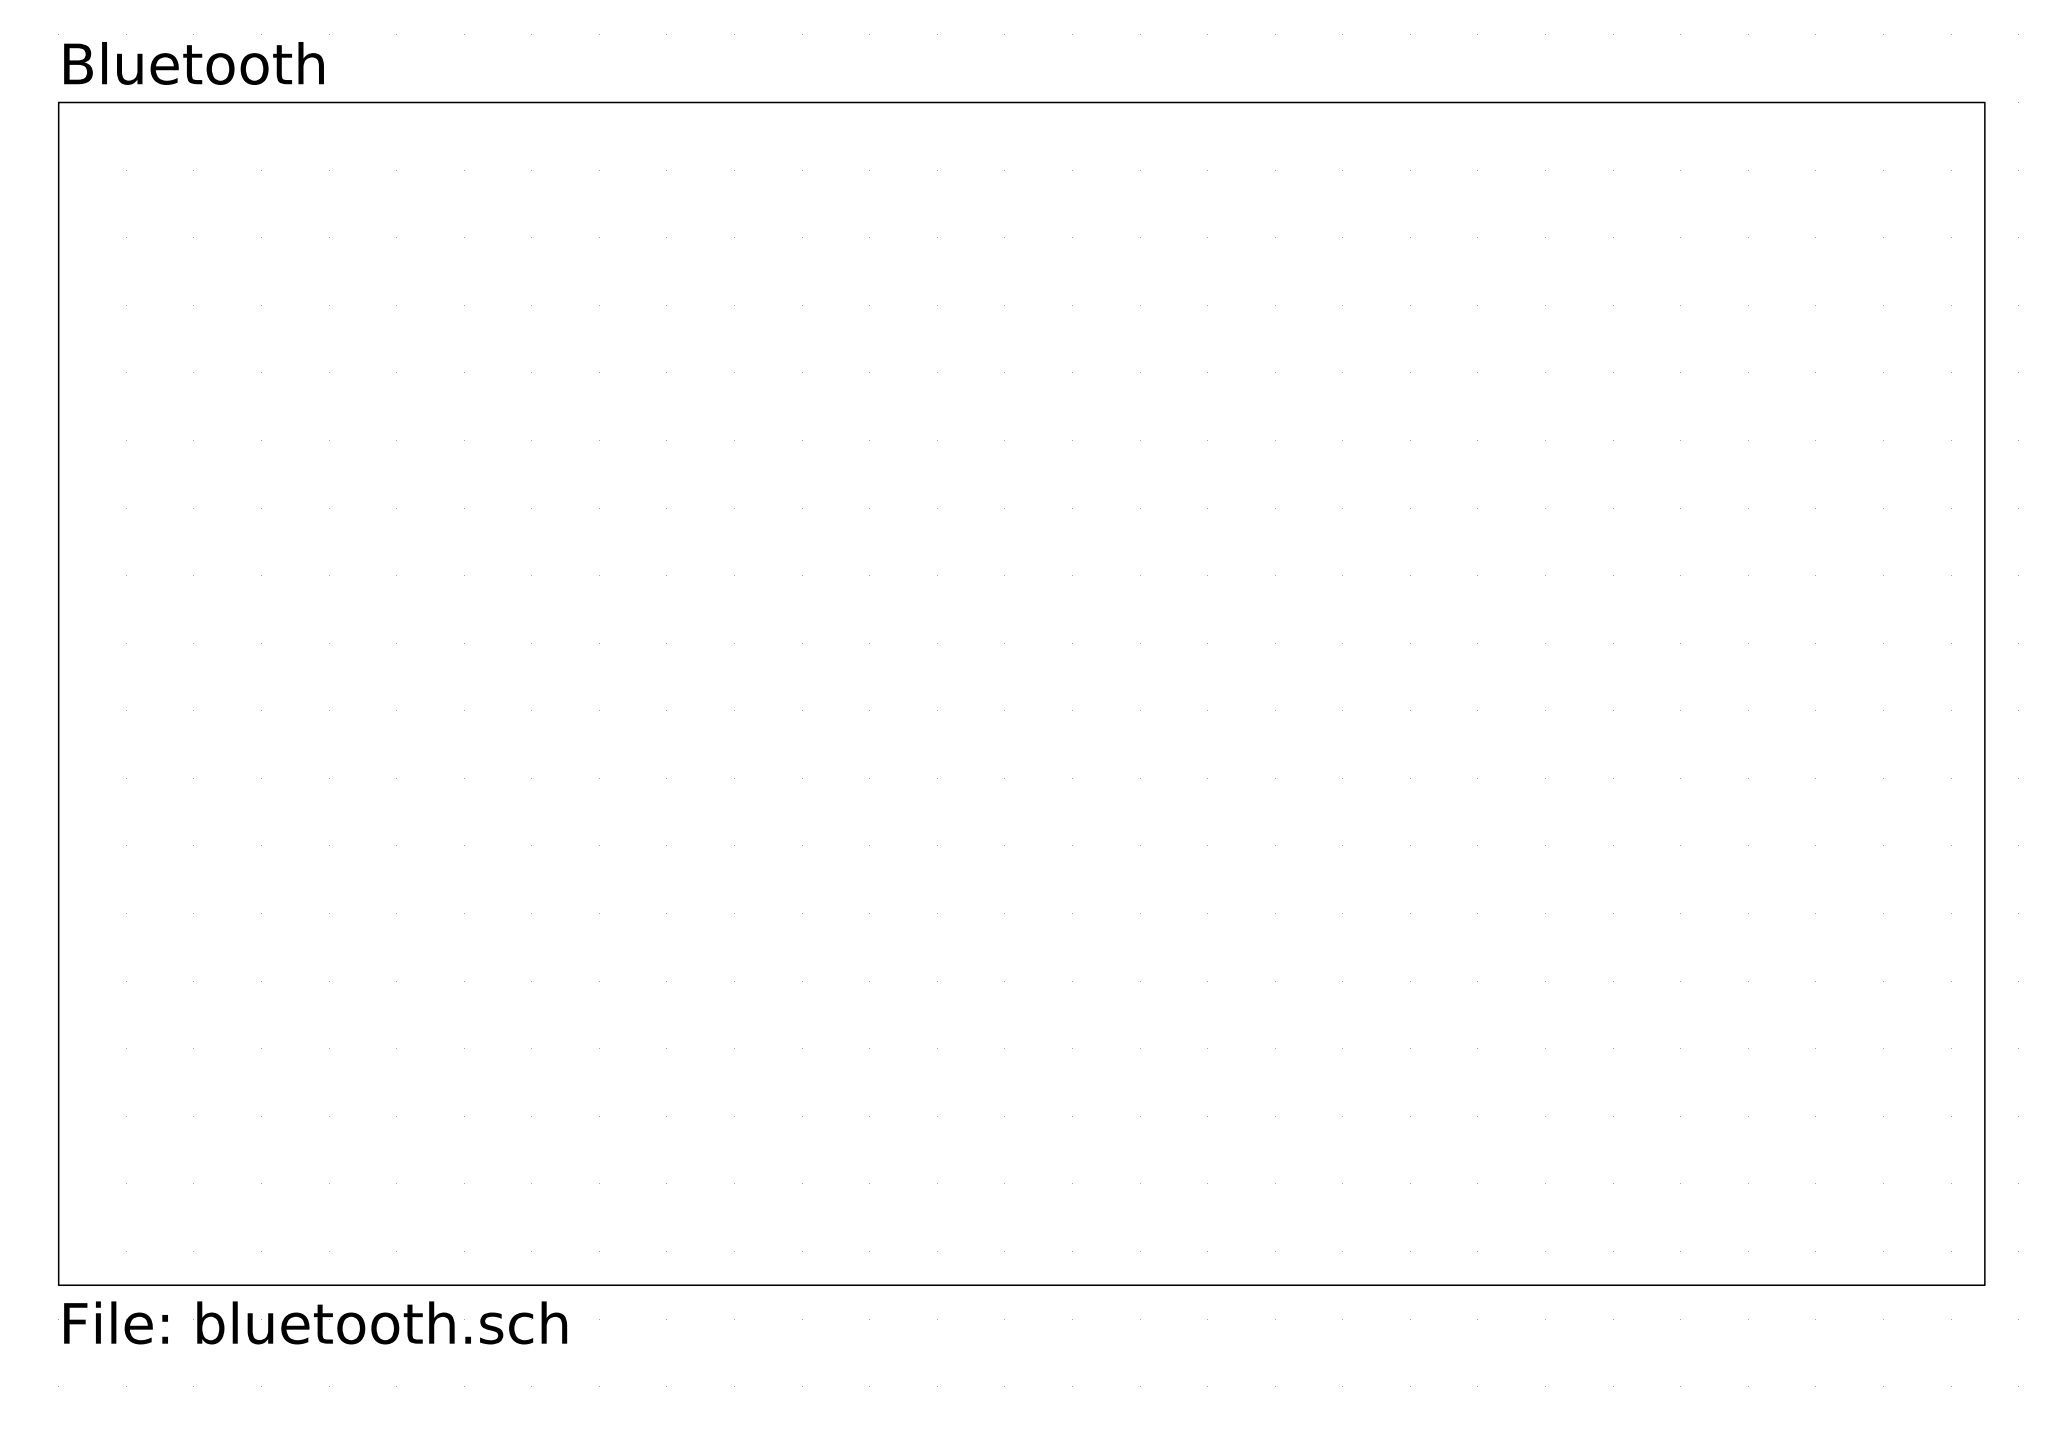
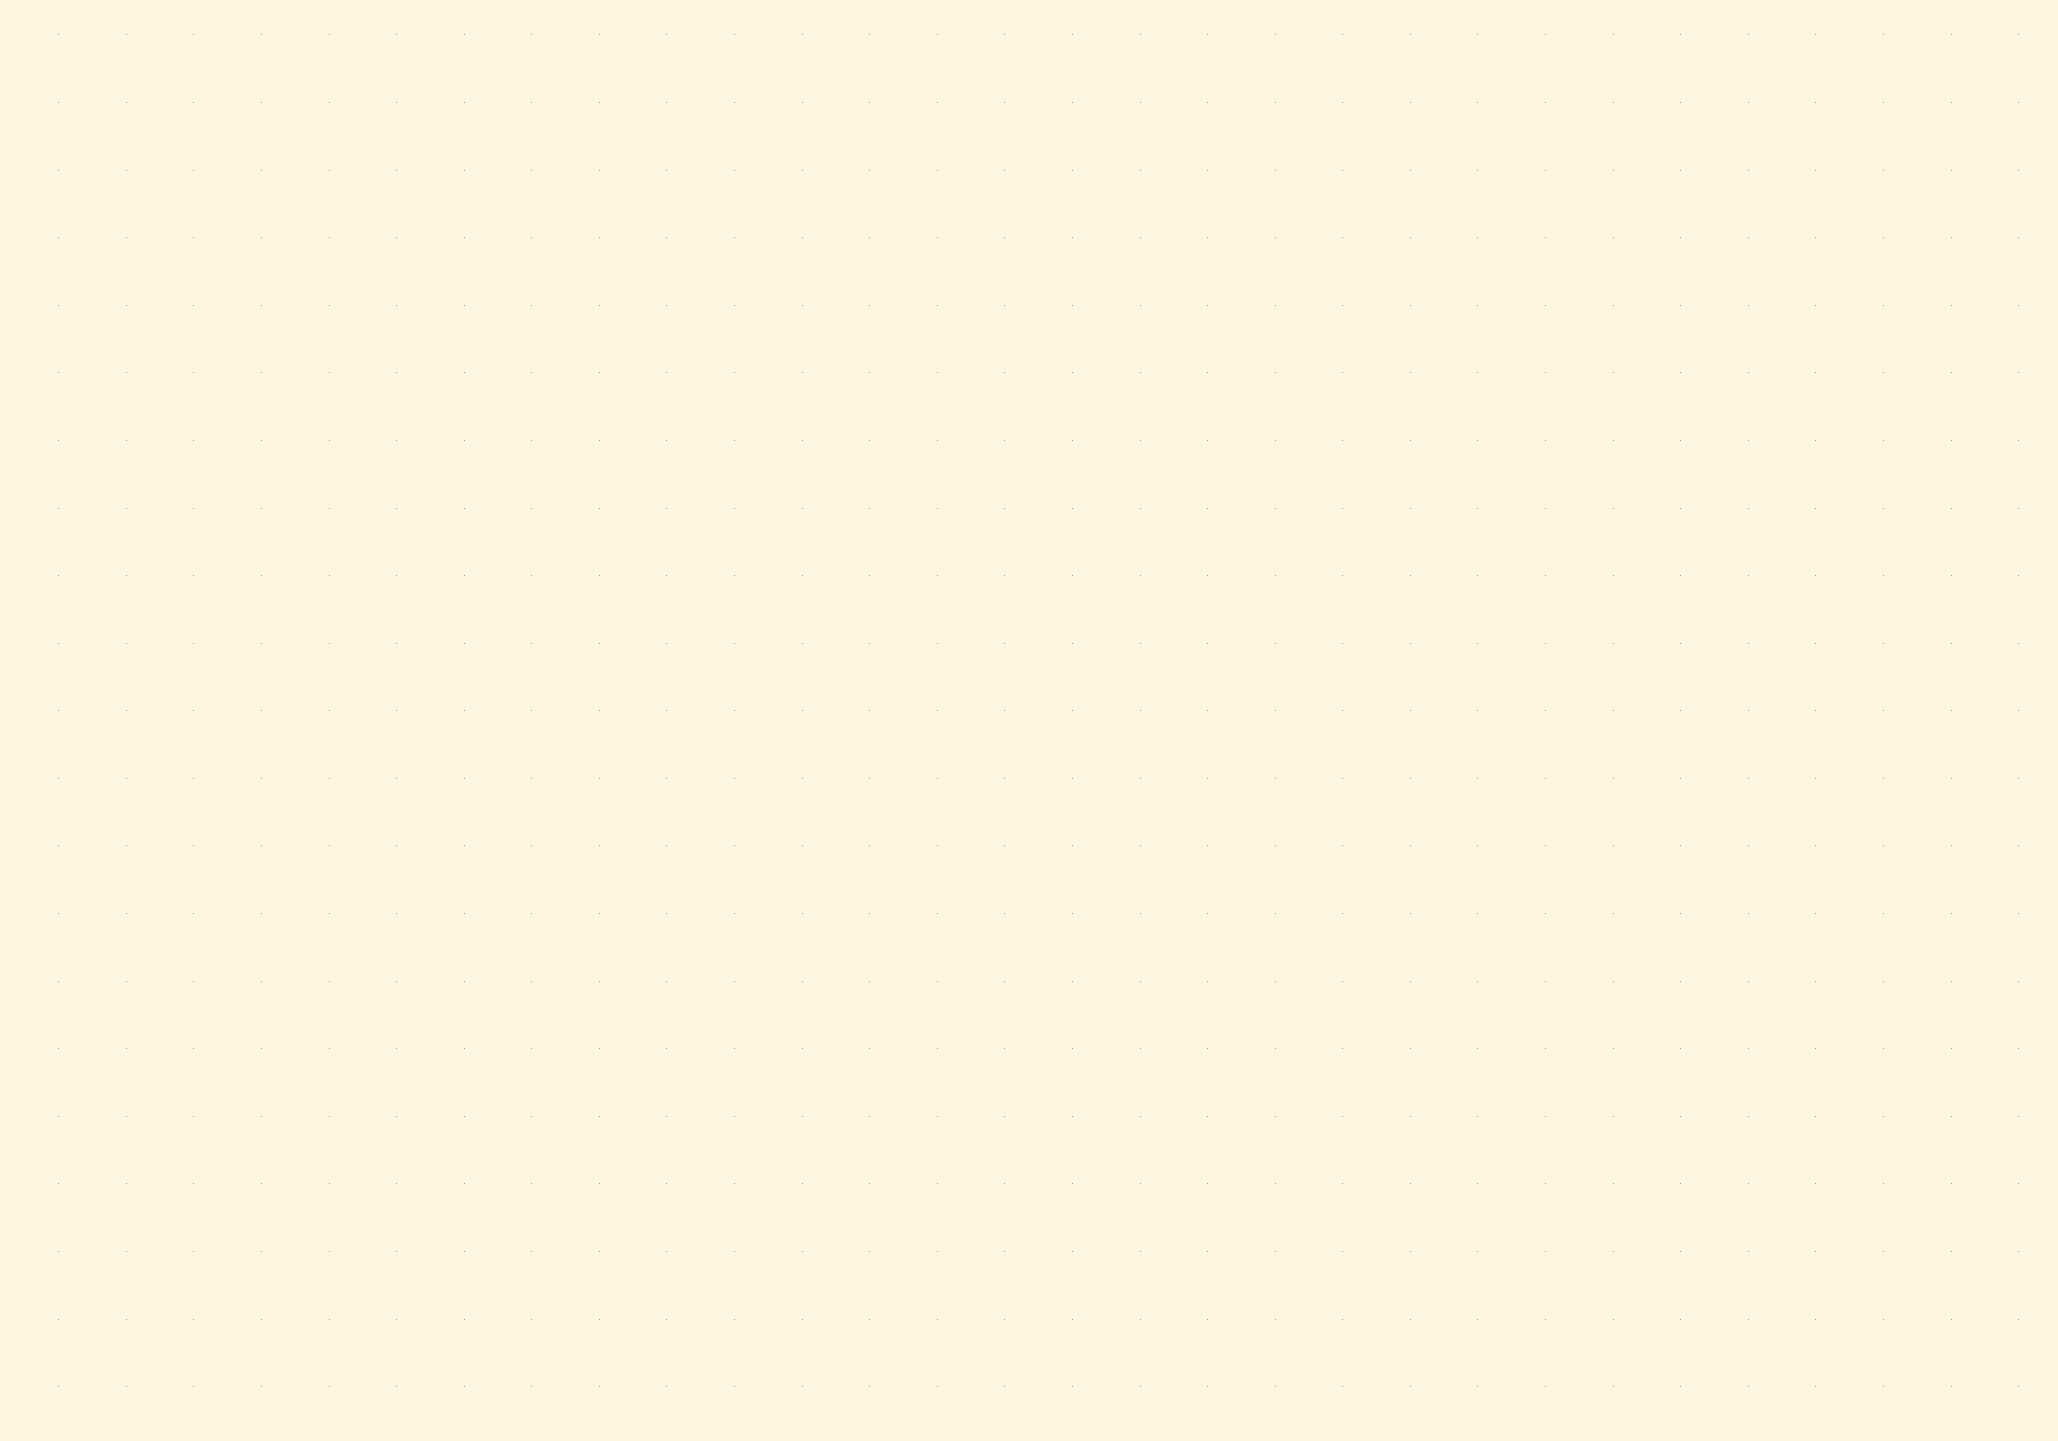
sheet Bluetooth: File: bluetooth.sch (1021, 693) -> none

